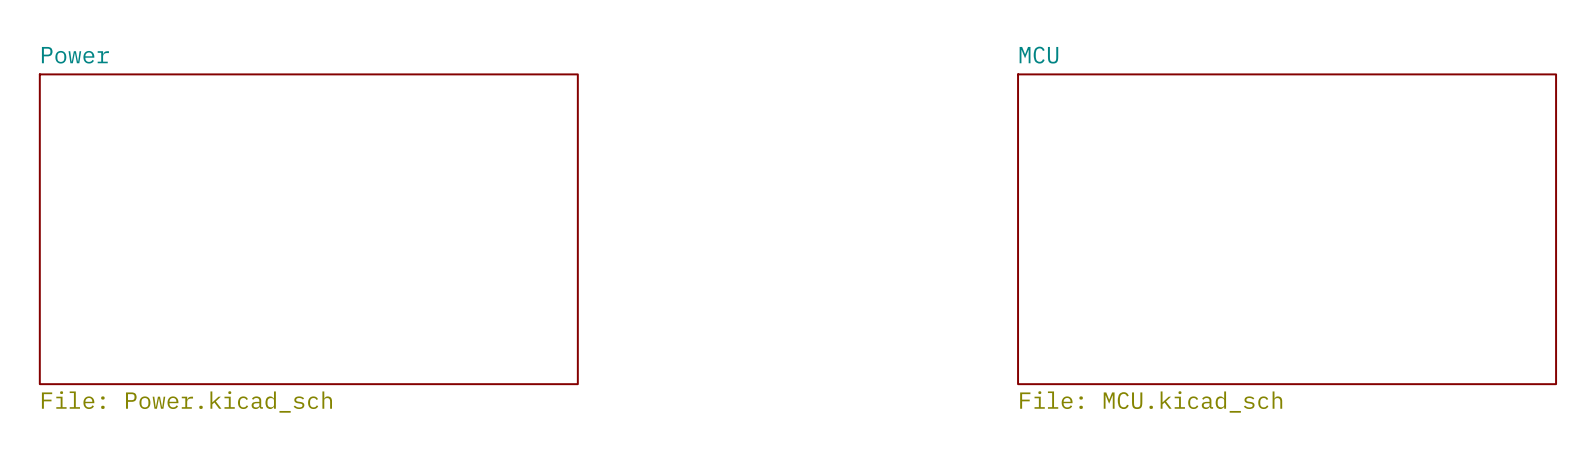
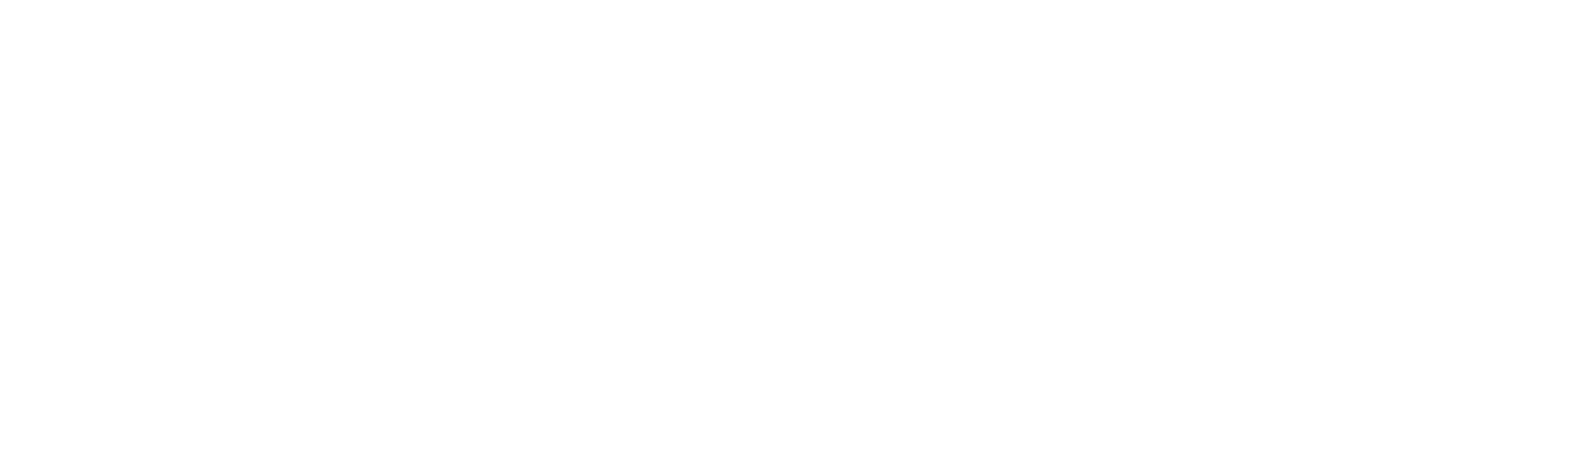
sheet Power: File: Power.kicad_sch (308, 229) -> none
sheet MCU: File: MCU.kicad_sch (1287, 229) -> none

